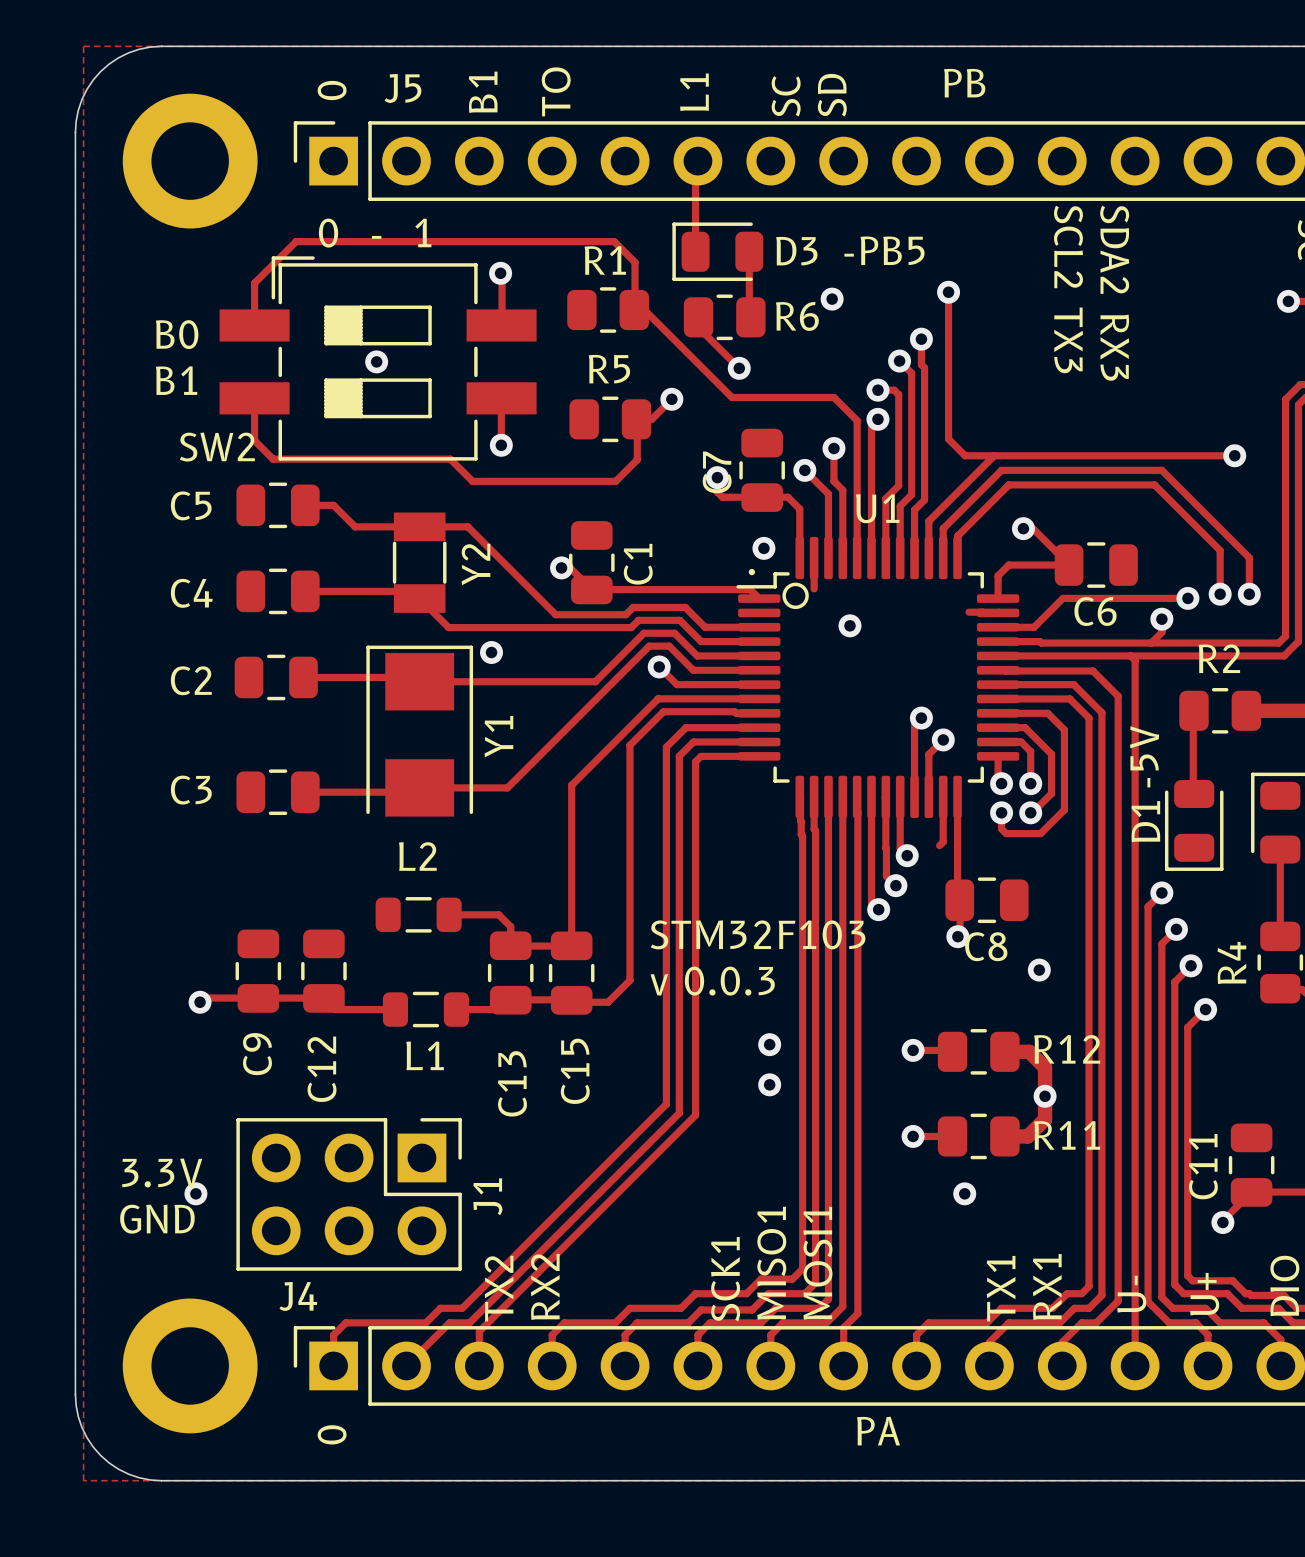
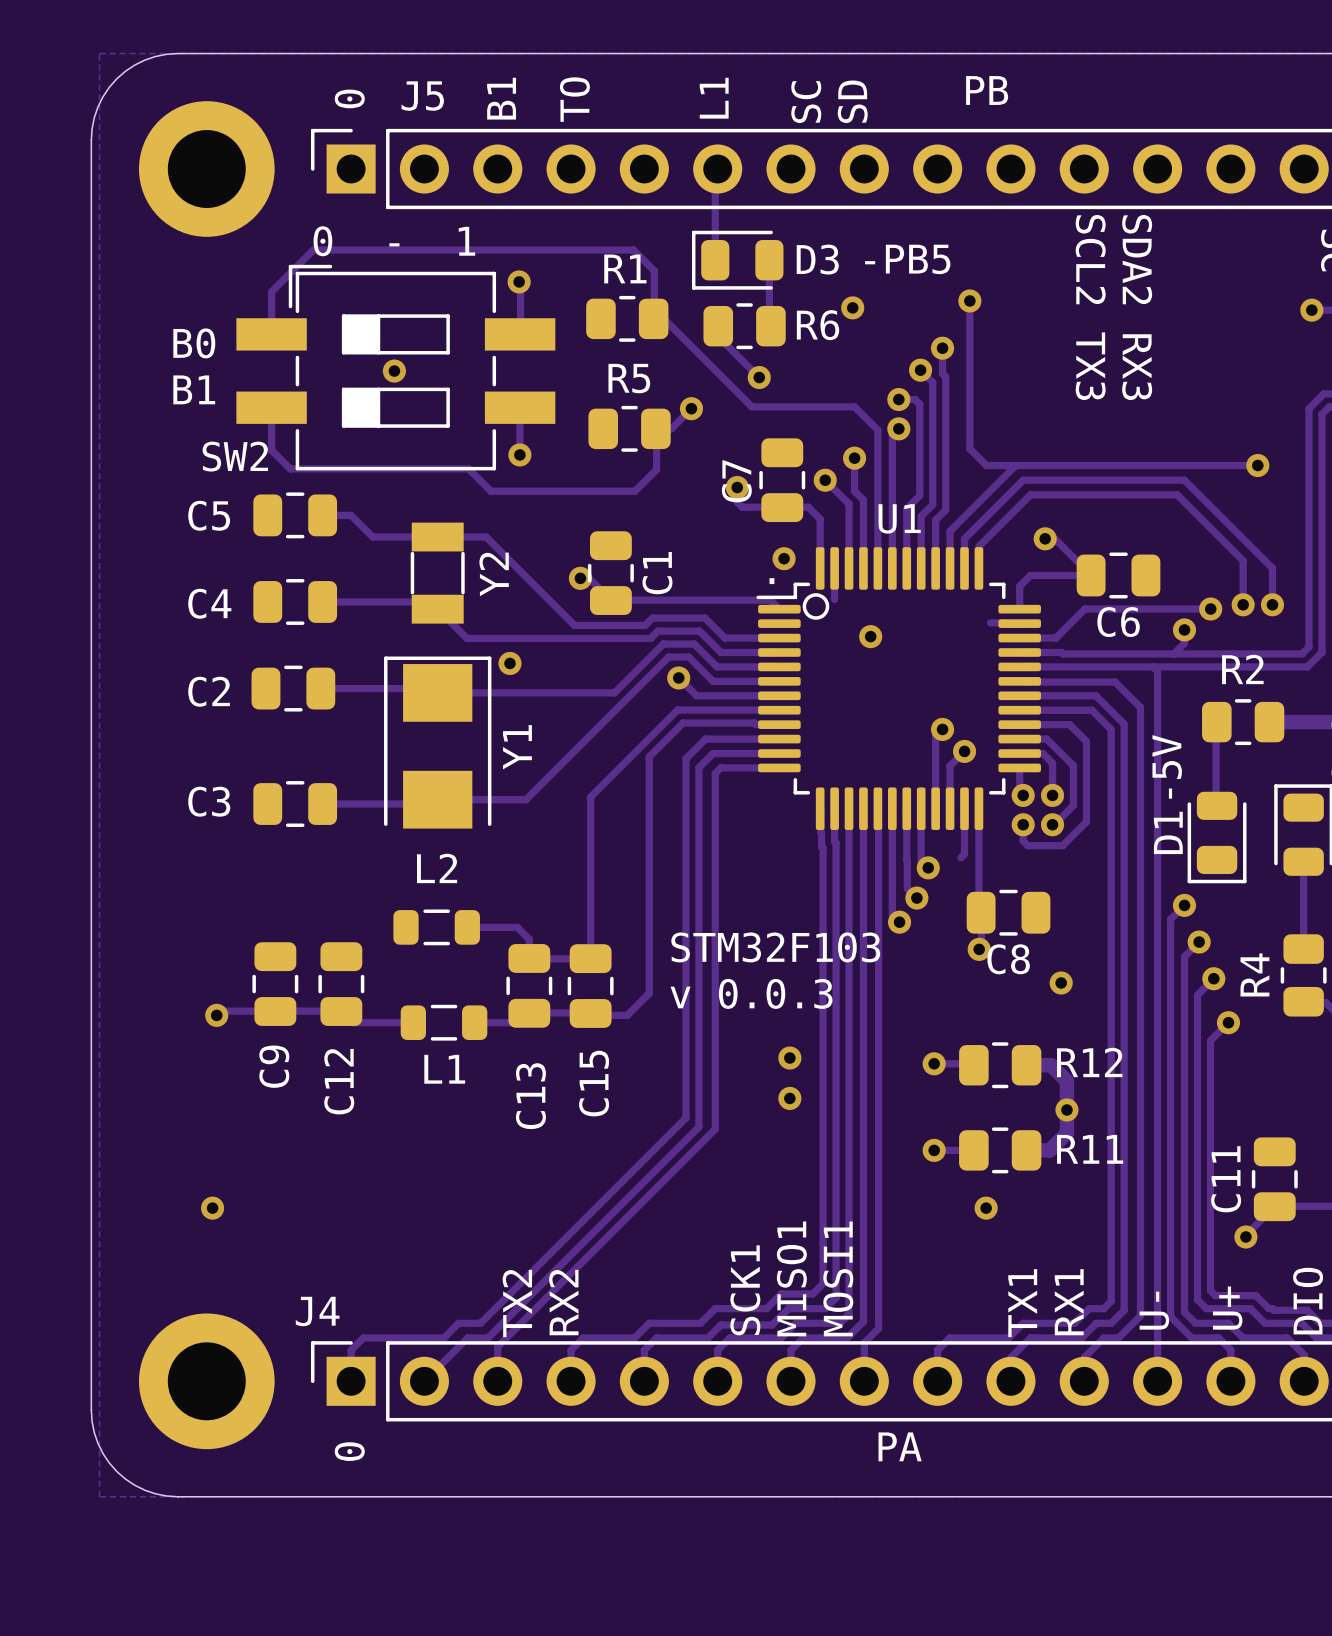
text: 3.3V (162, 1173) -> none
J1: (349, 1194) -> none
text: GND (157, 1219) -> none

